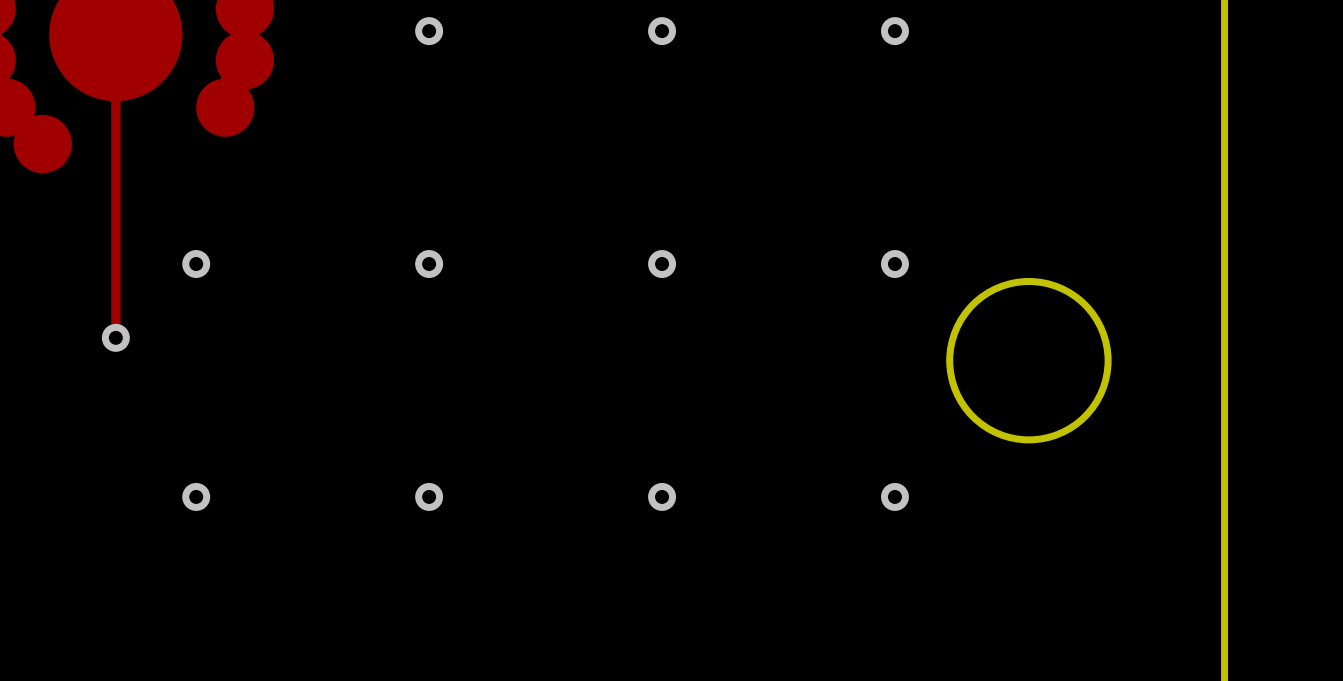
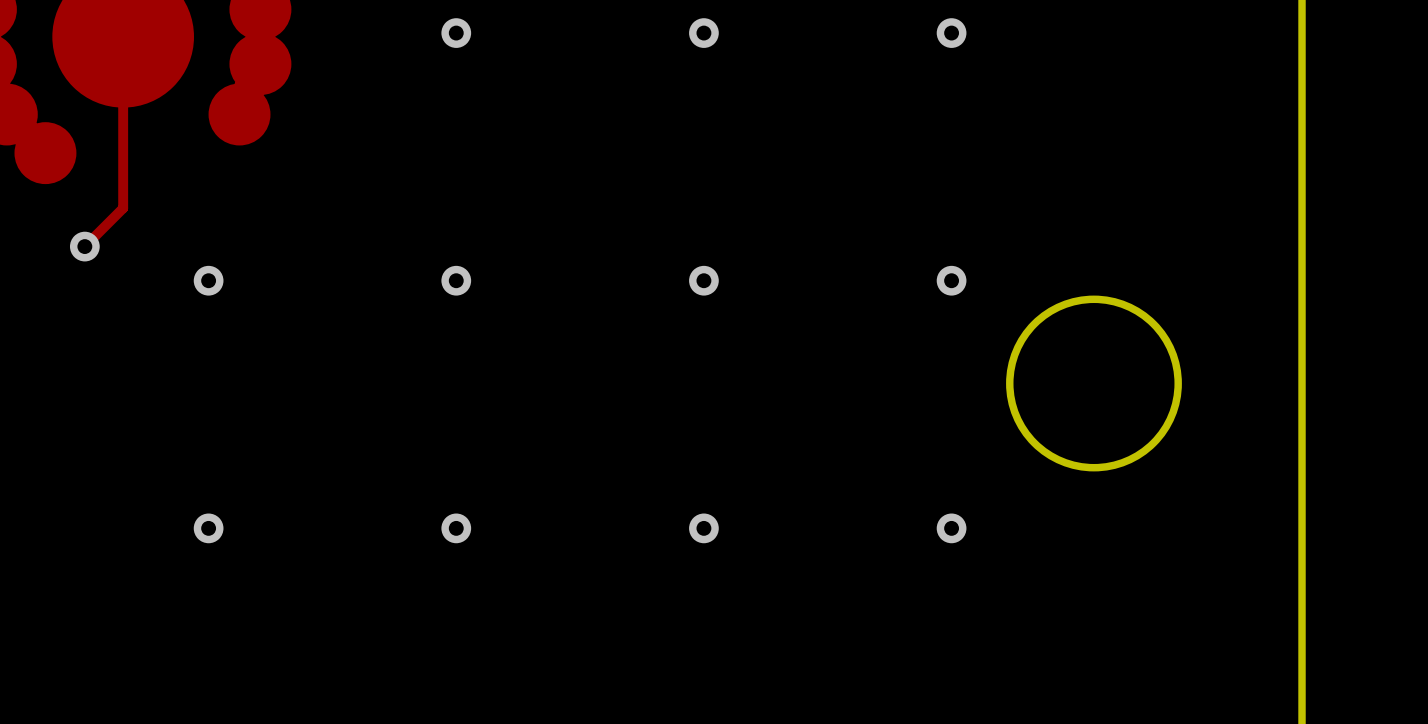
top track: (115, 195) (115, 337) -> (123, 208) (84, 246)
via position: (115, 337) -> (84, 246)

